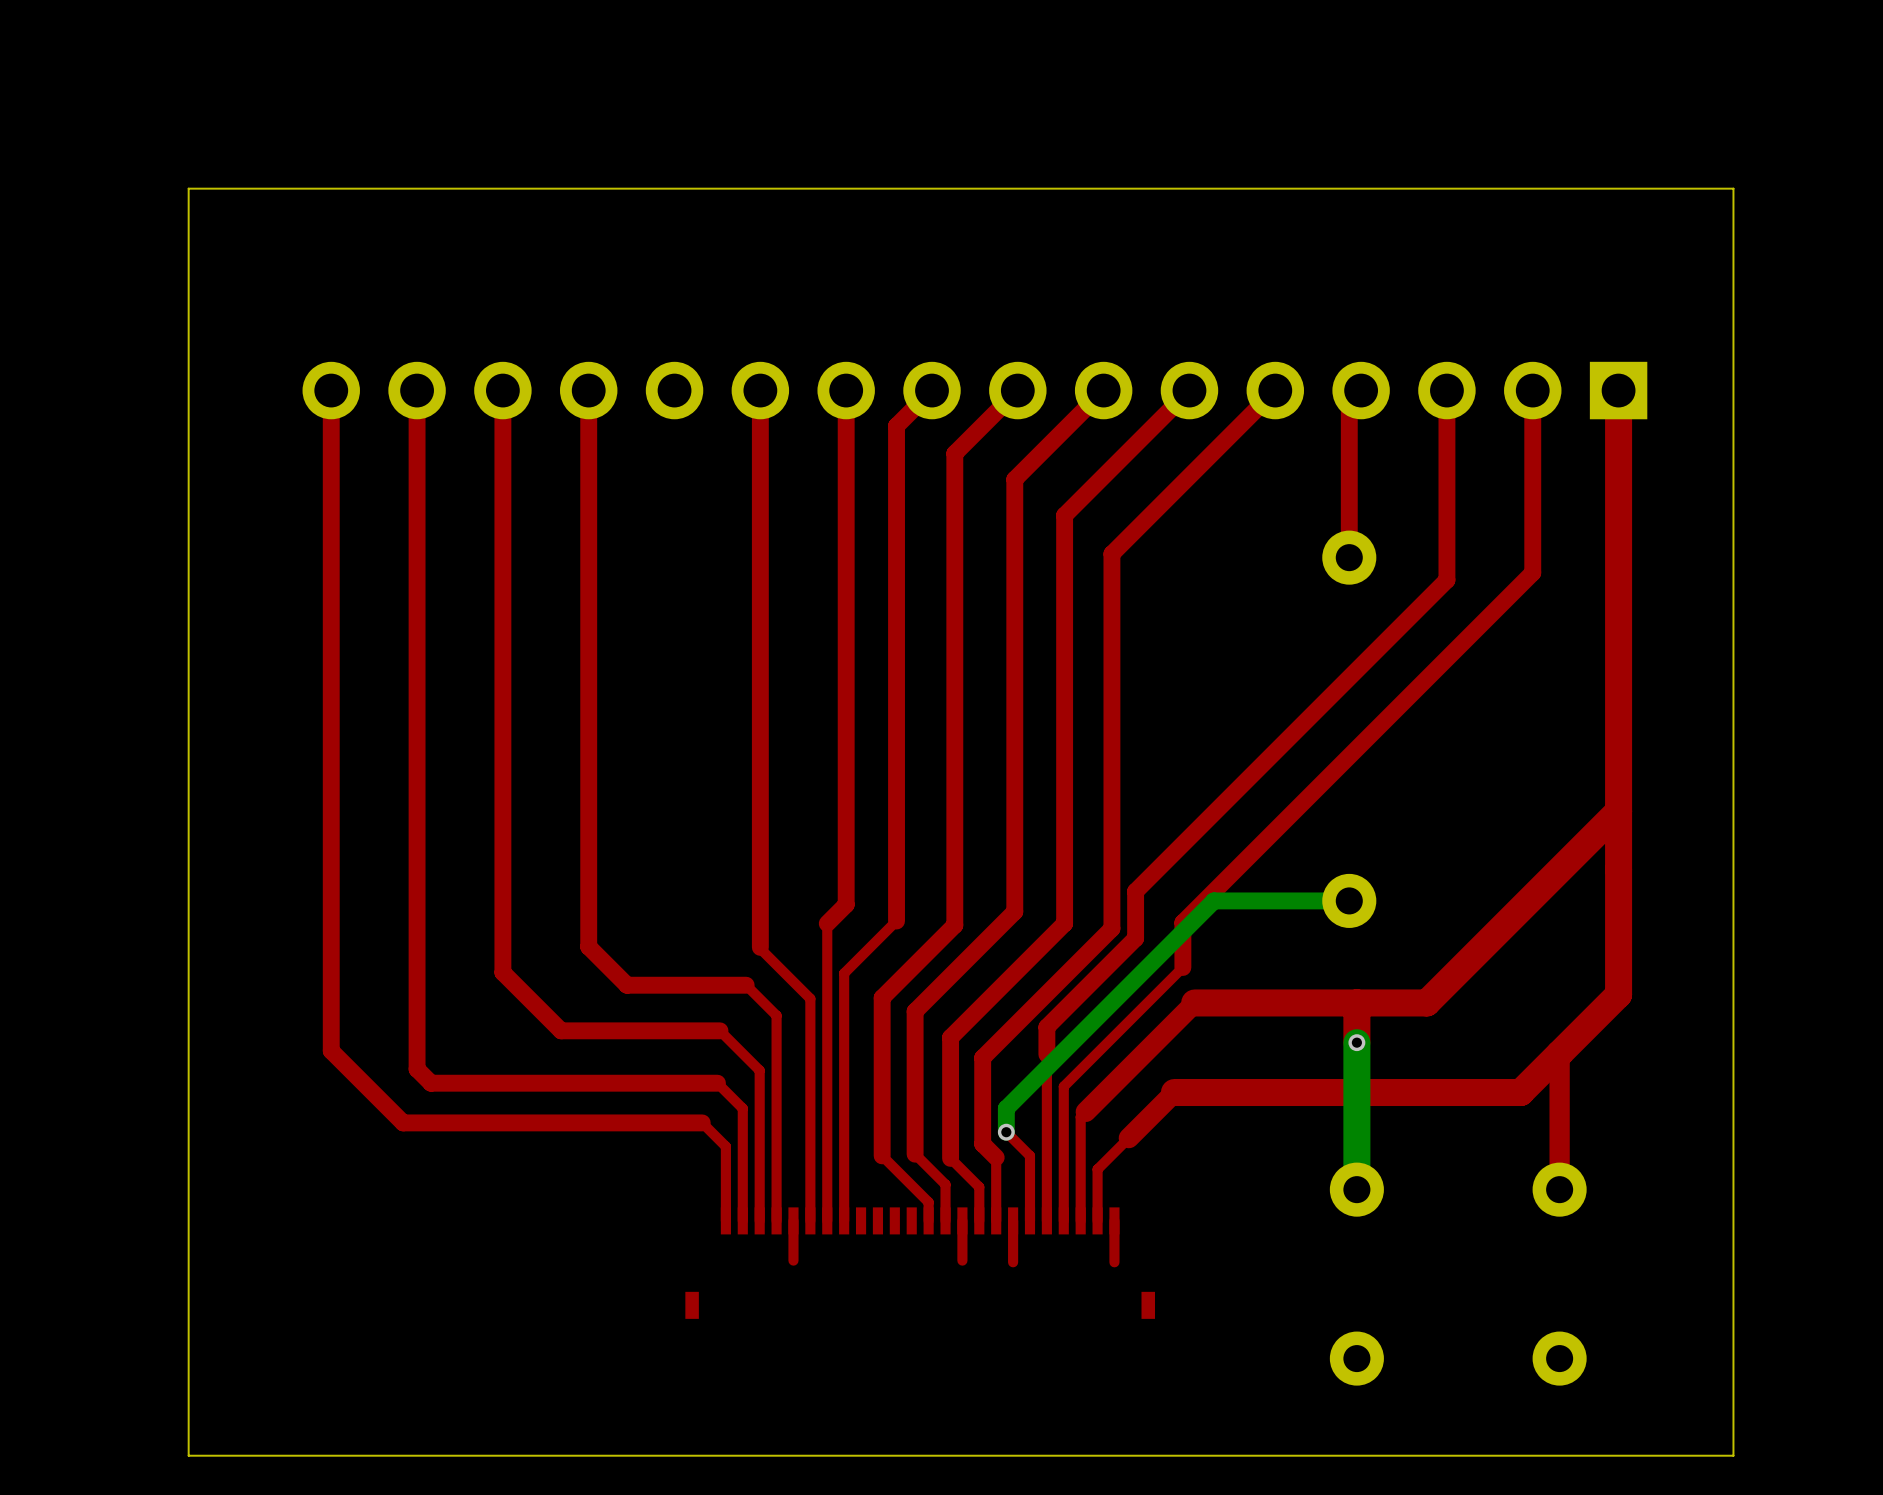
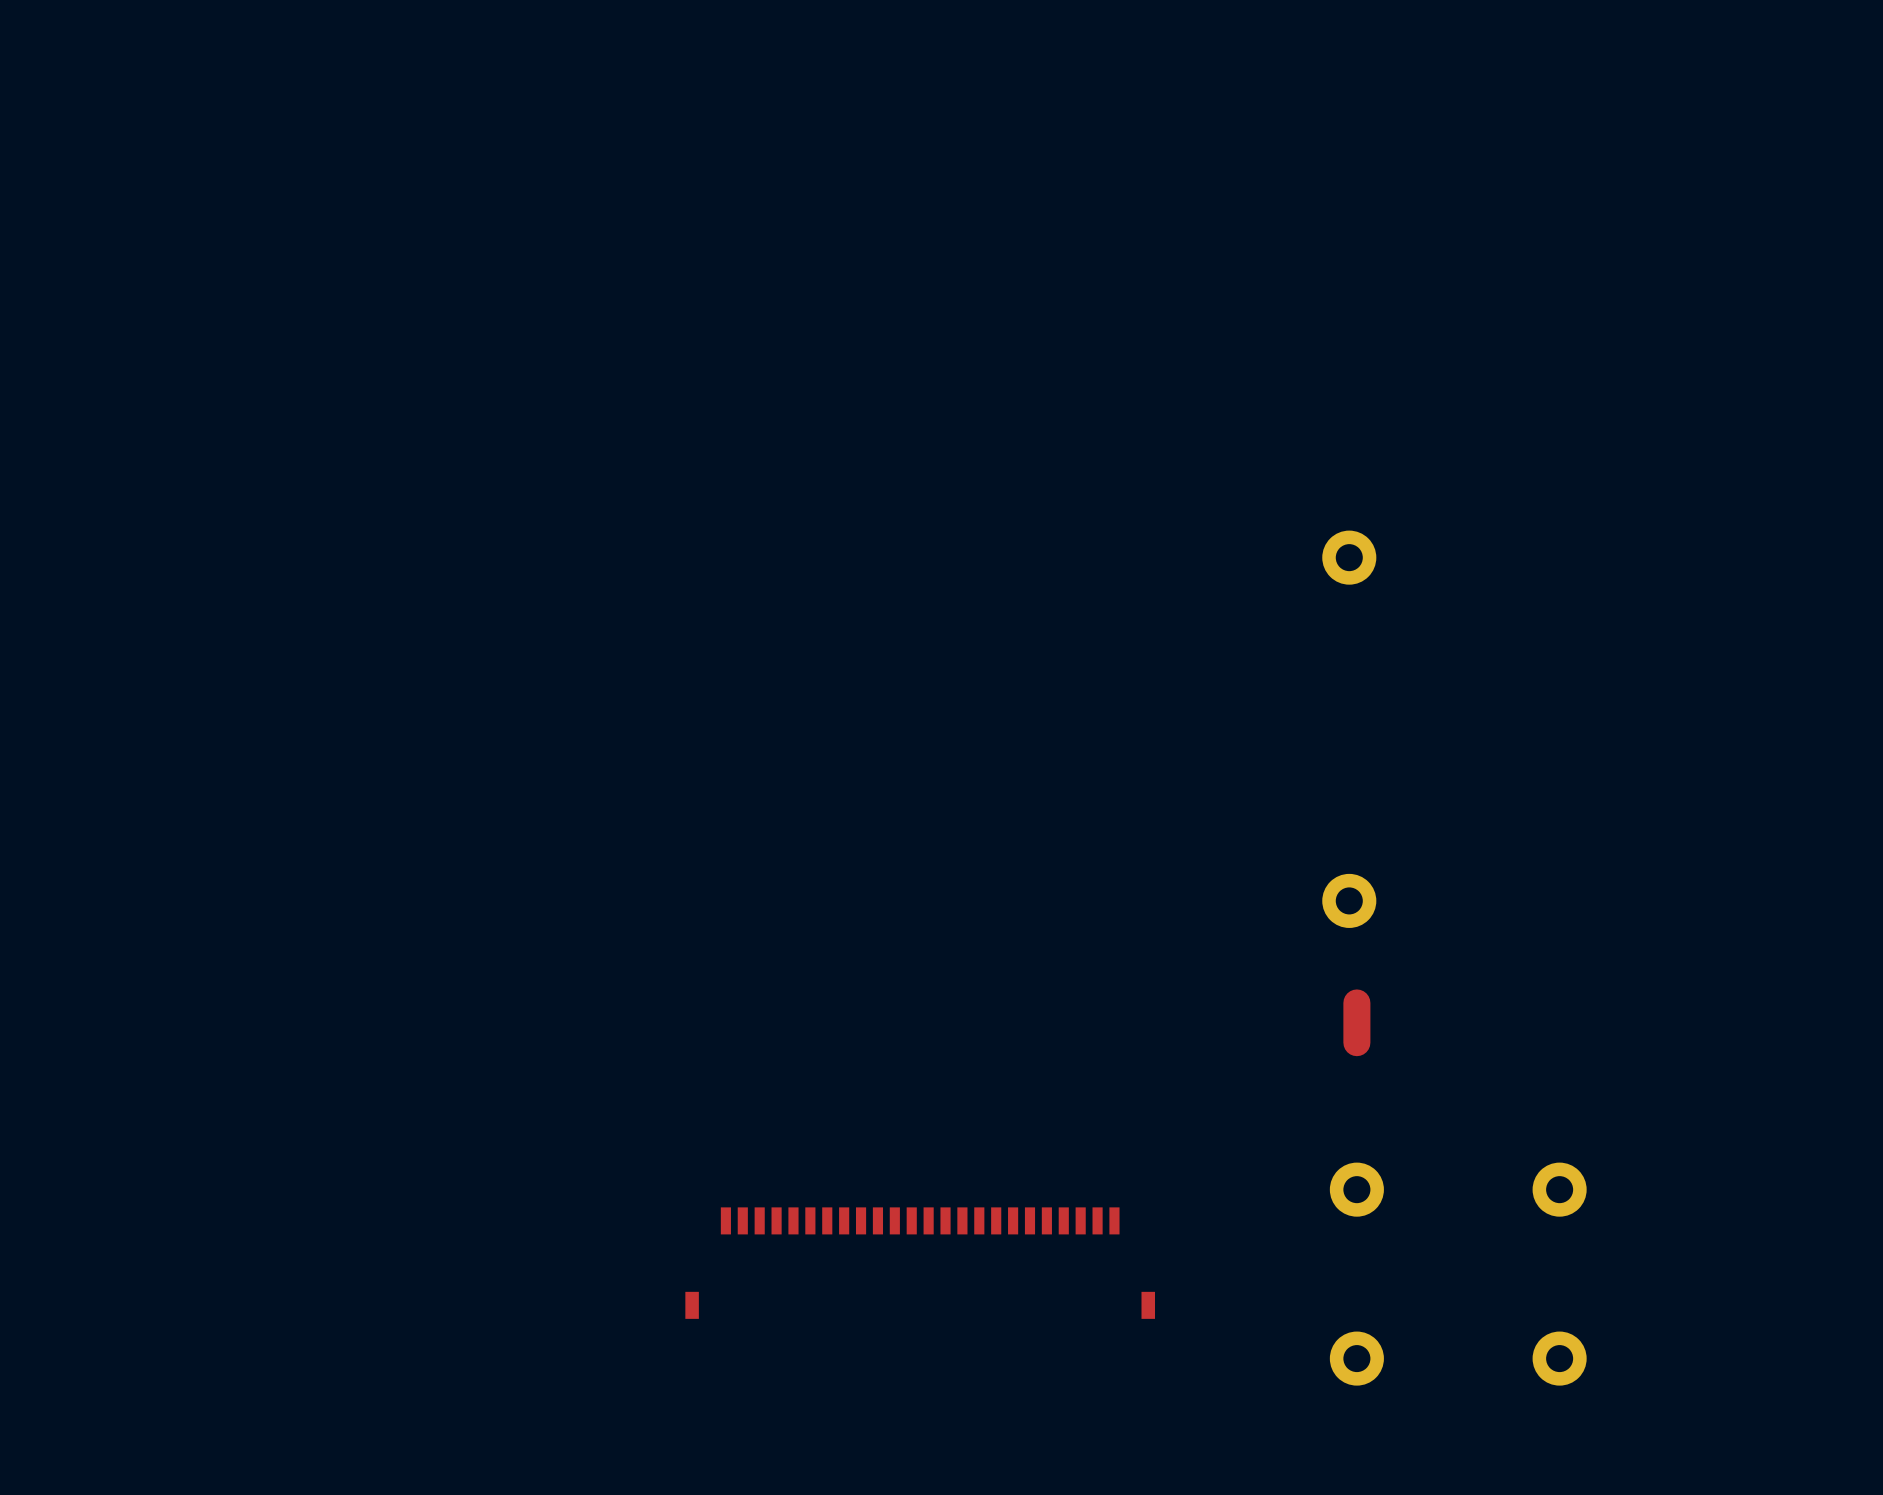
board edge: (1733, 188) (188, 188) (188, 1455) (1733, 1455) (1733, 188) -> none
top track: (331, 390) (331, 1050) (403, 1122) (702, 1122) (725, 1146) (725, 1220) -> none
top track: (417, 390) (417, 1069) (431, 1083) (717, 1083) (742, 1108) (742, 1220) -> none
top track: (502, 390) (502, 972) (561, 1030) (719, 1030) (759, 1070) (759, 1220) -> none
top track: (588, 390) (588, 946) (627, 985) (746, 985) (776, 1015) (776, 1220) -> none
top track: (760, 390) (760, 947) -> none
top track: (846, 390) (846, 904) (827, 923) (827, 1220) -> none
top track: (932, 390) (896, 426) (896, 921) (844, 973) (844, 1220) -> none
part: (974, 390) -> none
top track: (1017, 390) (954, 453) (954, 925) (882, 997) (882, 1155) (928, 1202) (928, 1220) -> none
top track: (1103, 390) (1014, 479) (1014, 911) (915, 1011) (915, 1154) (945, 1184) (945, 1220) -> none
top track: (1189, 390) (1064, 515) (1064, 923) (950, 1037) (950, 1158) (979, 1187) (979, 1220) -> none
top track: (1275, 390) (1111, 553) (1111, 928) (982, 1057) (982, 1144) (996, 1157) (996, 1220) -> none
top track: (1361, 390) (1349, 402) (1349, 557) -> none
top track: (1446, 390) (1446, 580) (1135, 891) (1135, 938) (1046, 1027) (1046, 1220) -> none
top track: (1532, 390) (1532, 572) (1182, 922) (1182, 967) (1063, 1086) (1063, 1220) -> none
top track: (1618, 390) (1618, 994) (1520, 1092) (1174, 1092) (1097, 1169) (1097, 1220) -> none
top track: (1618, 811) (1426, 1002) (1194, 1002) (1080, 1116) (1080, 1220) -> none
bottom track: (1349, 900) (1213, 900) (1006, 1108) (1006, 1132) -> none
top track: (759, 948) (810, 998) (810, 1220) -> none
bottom track: (1356, 1042) (1356, 1189) -> none
via: (1356, 1042) -> none
top track: (1559, 1053) (1559, 1189) -> none
top track: (1006, 1132) (1029, 1155) (1029, 1220) -> none
via: (1006, 1132) -> none
top track: (793, 1220) (793, 1260) -> none
top track: (962, 1220) (962, 1260) -> none
top track: (1013, 1220) (1013, 1262) -> none
top track: (1114, 1220) (1114, 1262) -> none

